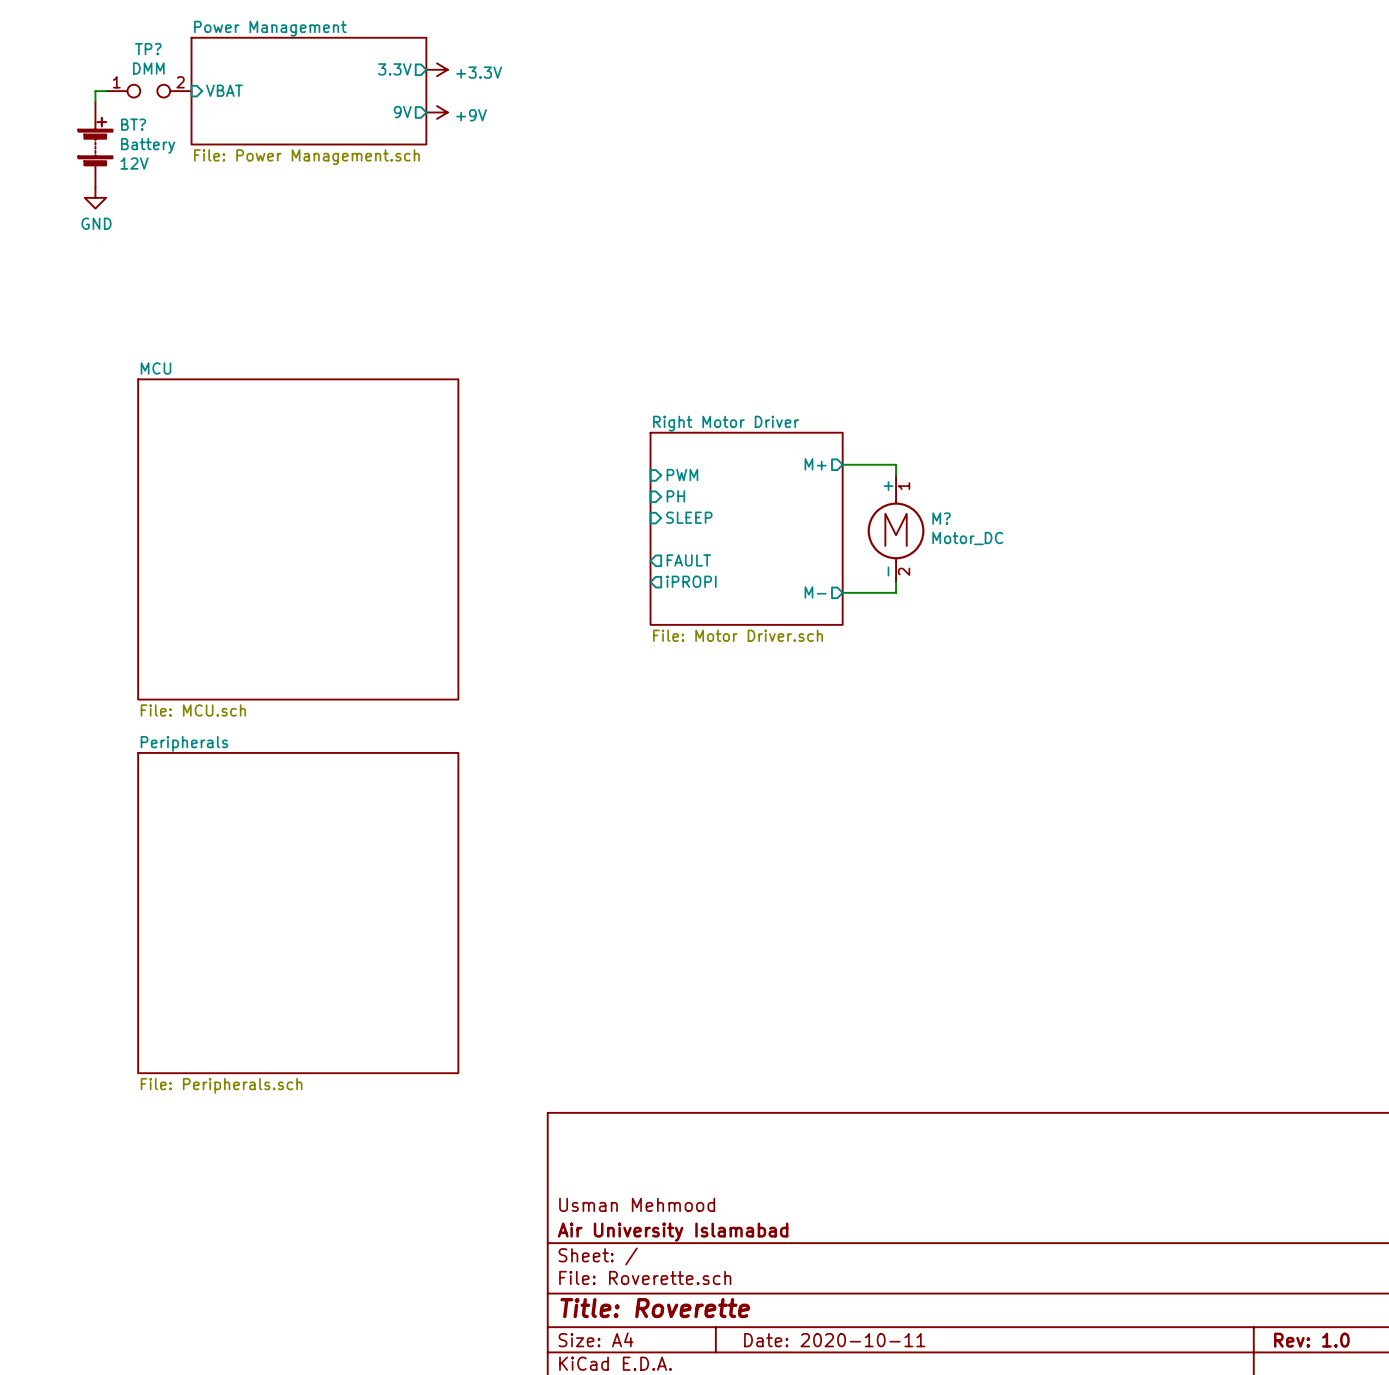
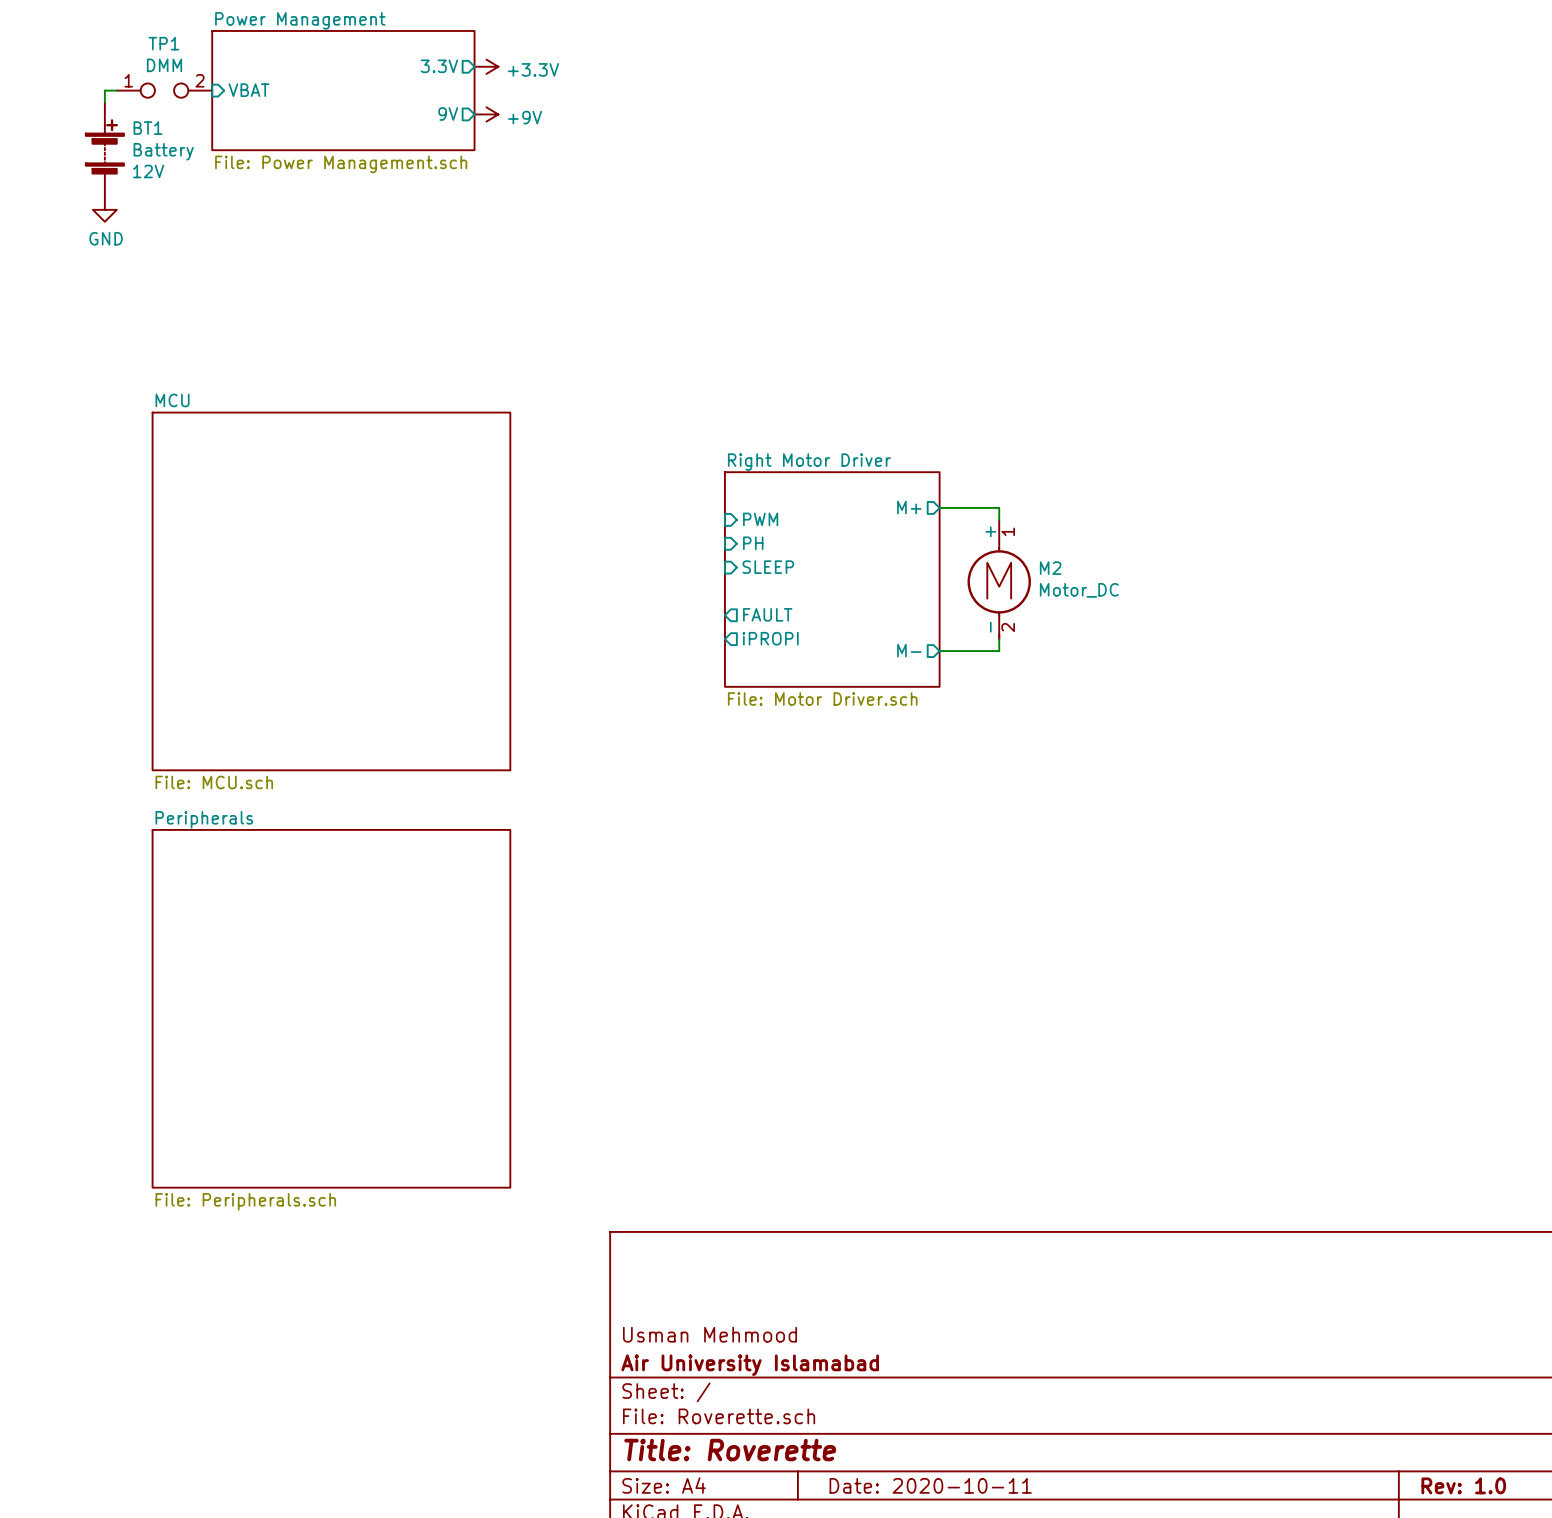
TP? name: TP? (148, 49) -> TP1 (163, 43)
BT? name: BT? (133, 124) -> BT1 (148, 128)
M? name: M? (941, 518) -> M2 (1050, 568)

